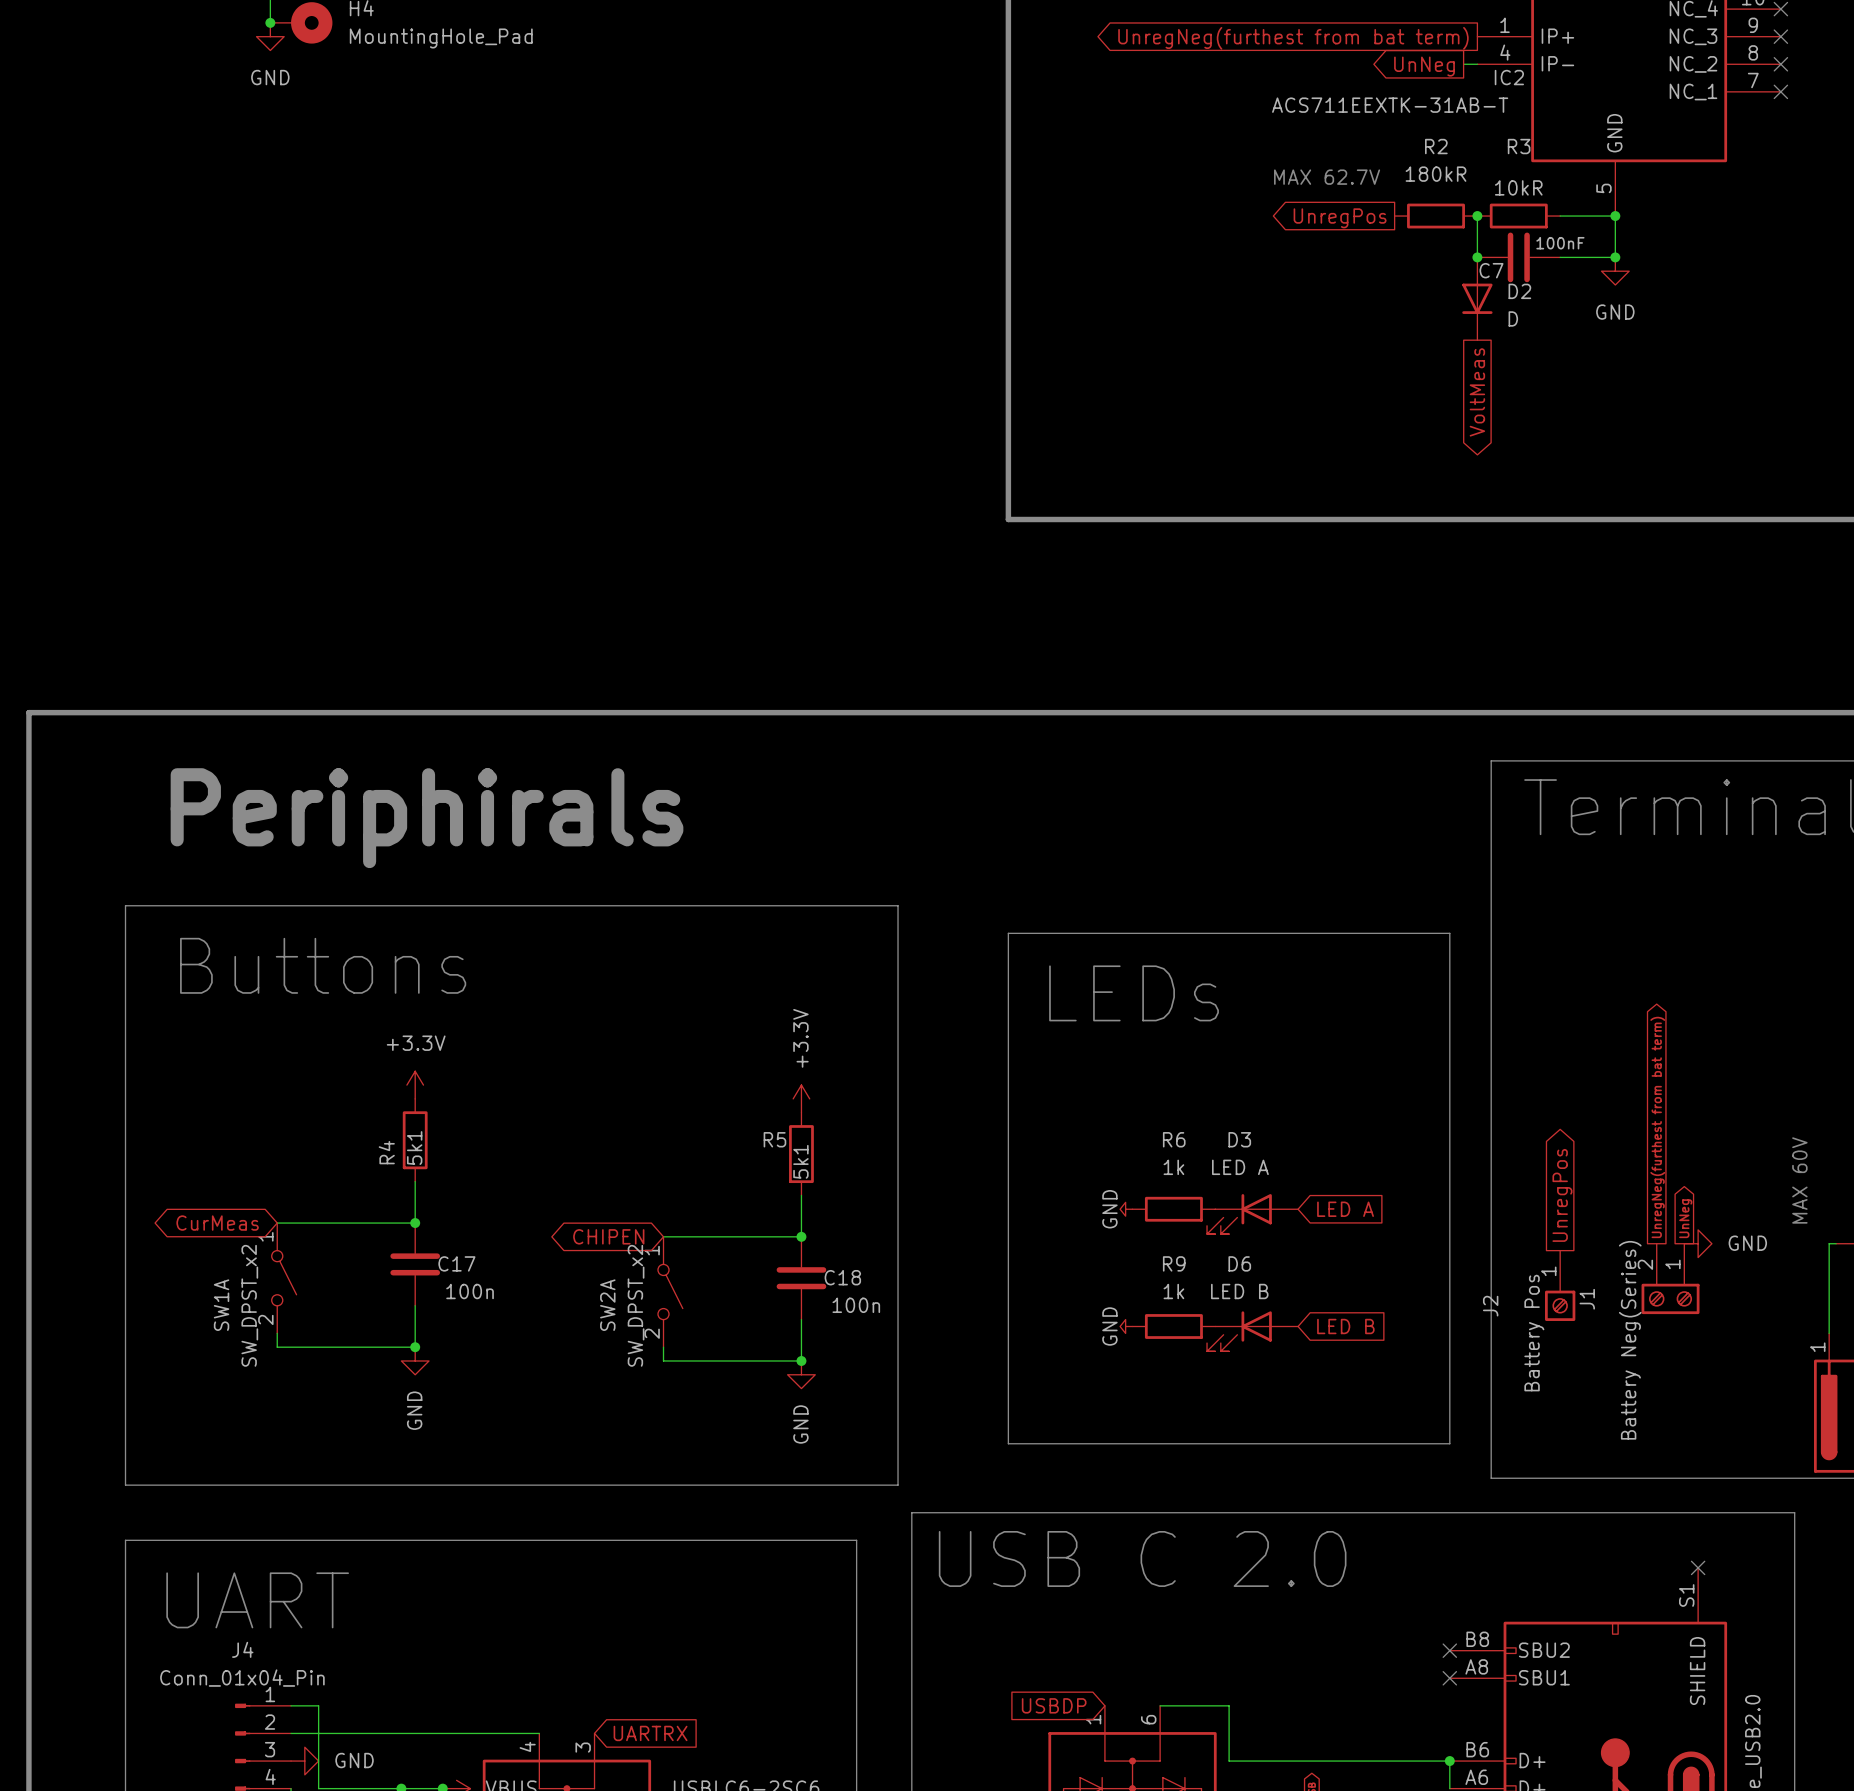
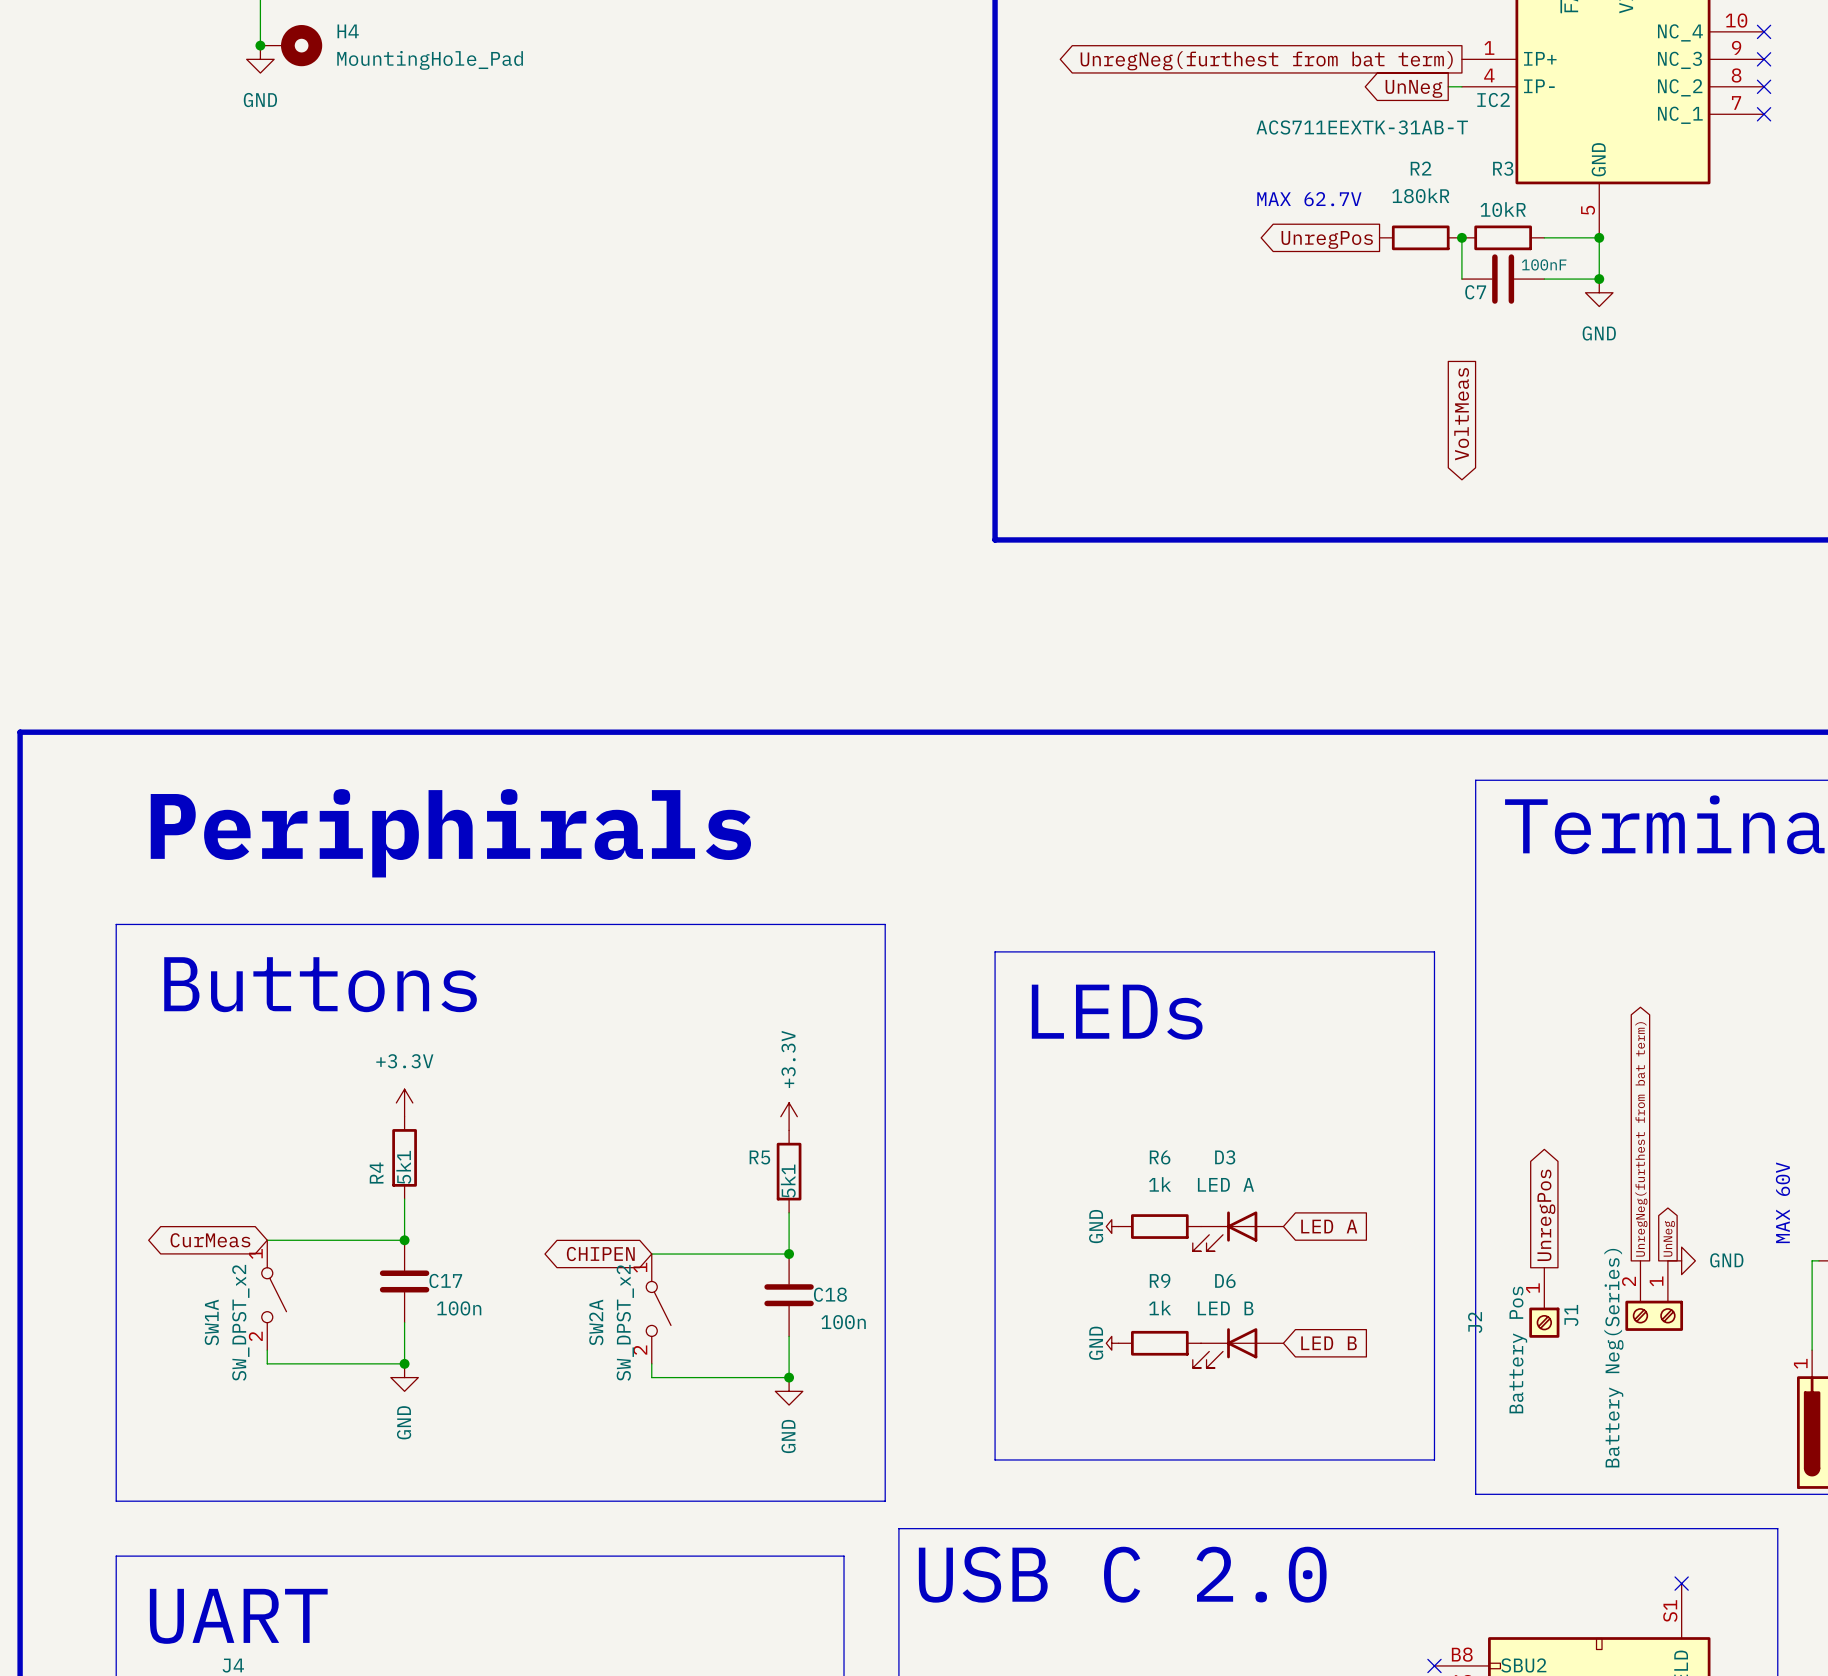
junction: (1477, 257) -> none
D2: D (1477, 298) -> none

